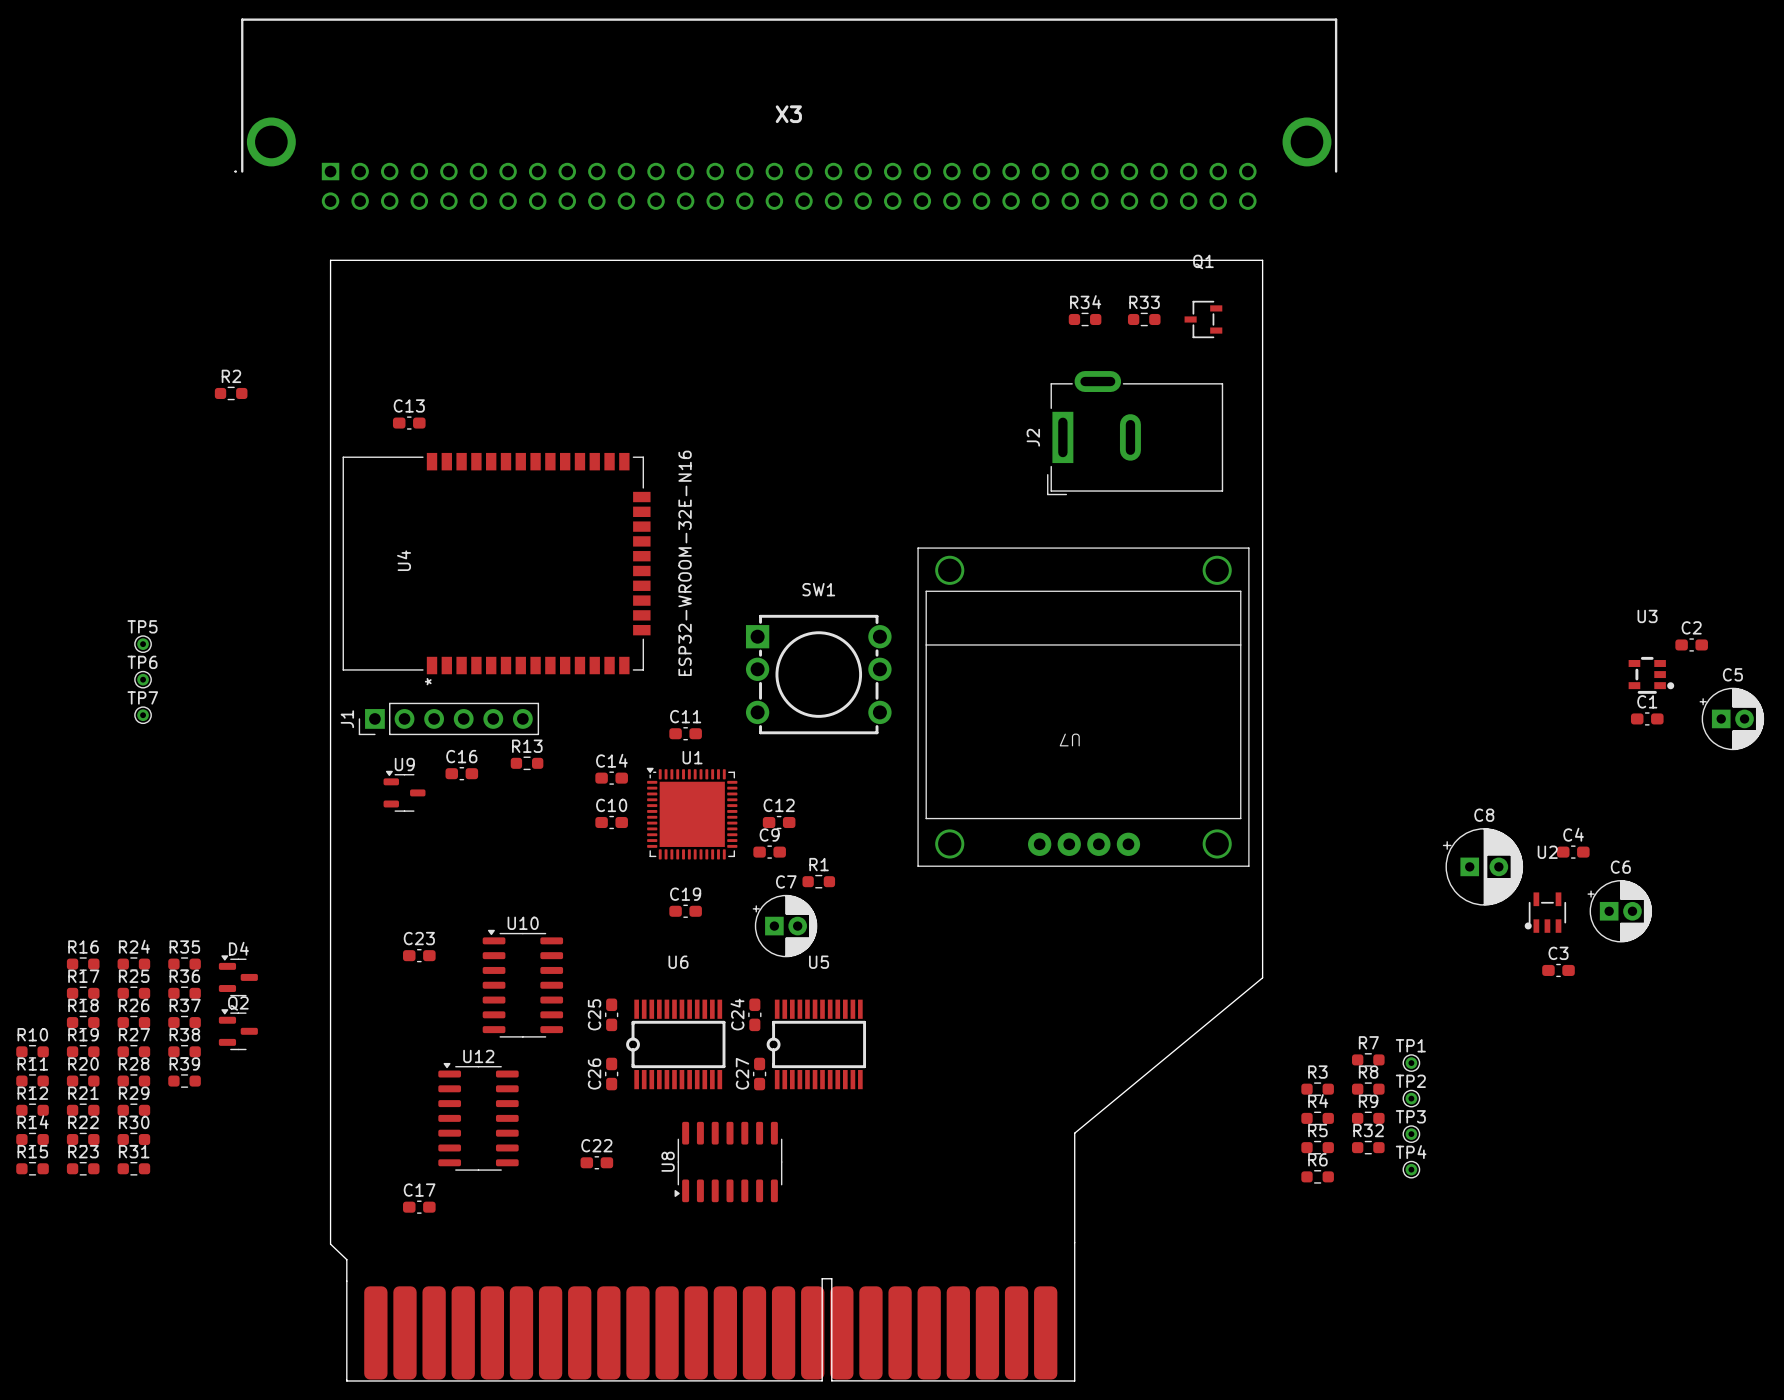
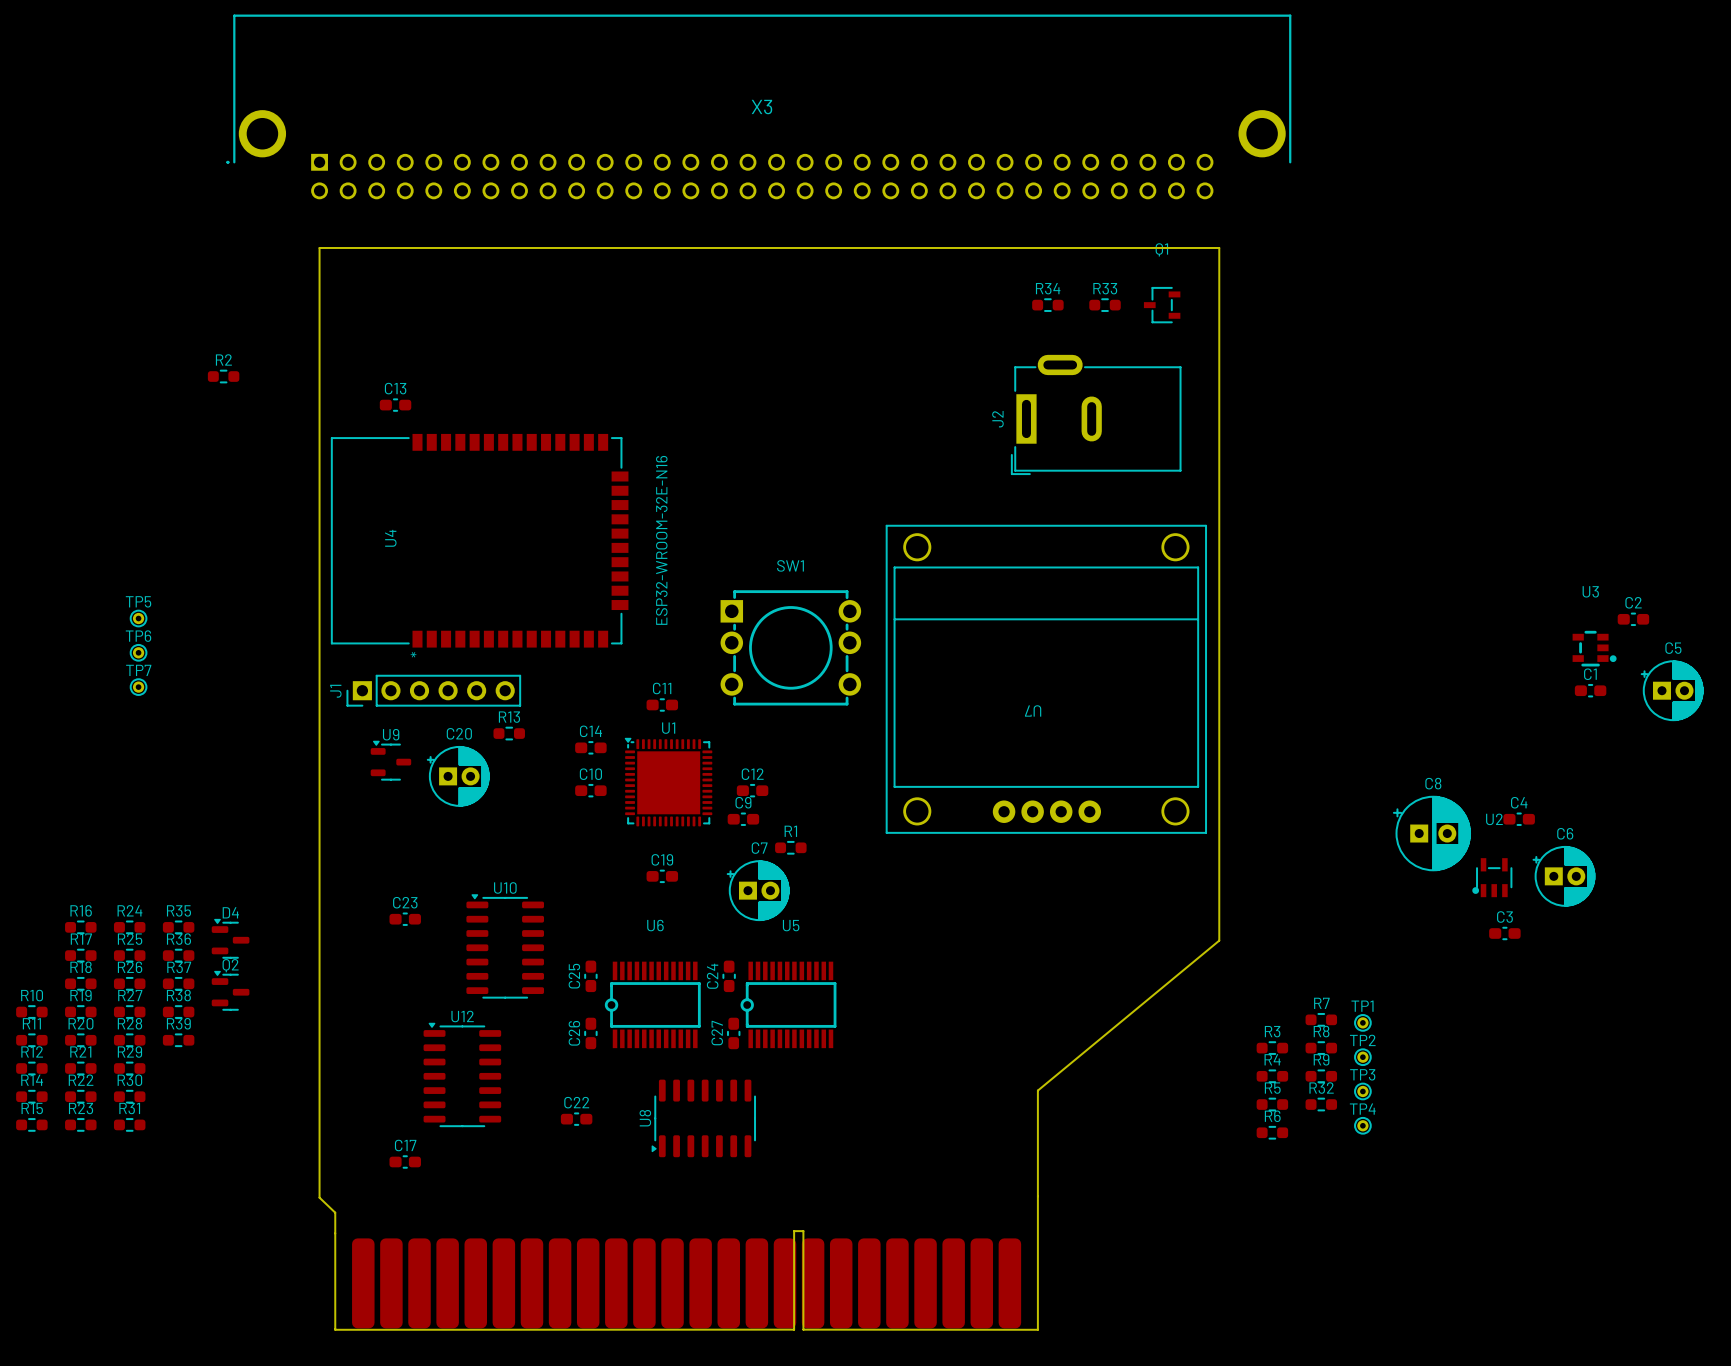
C16: (461, 773) -> none
C20: none -> (458, 776)

